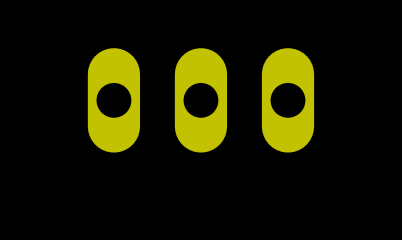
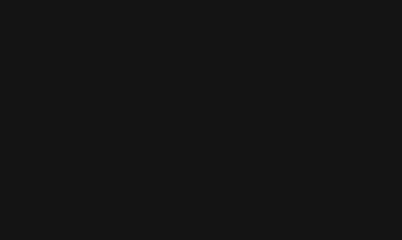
part: (200, 100) -> none

